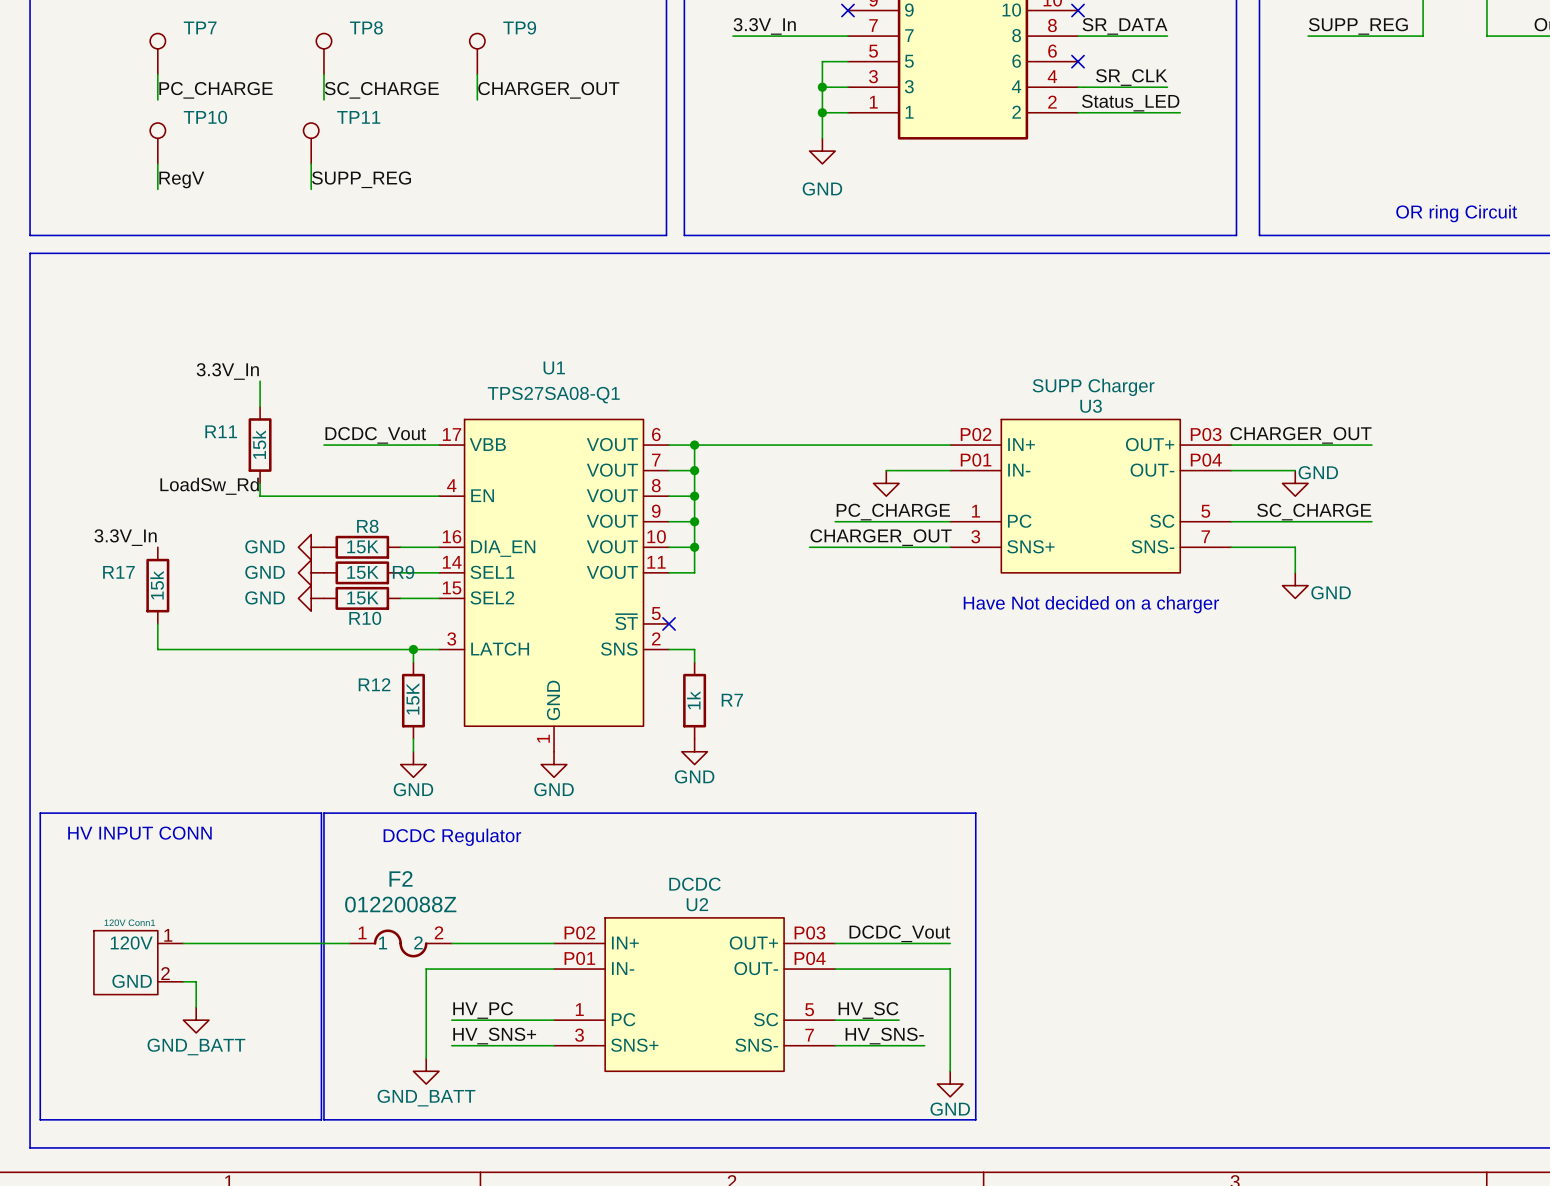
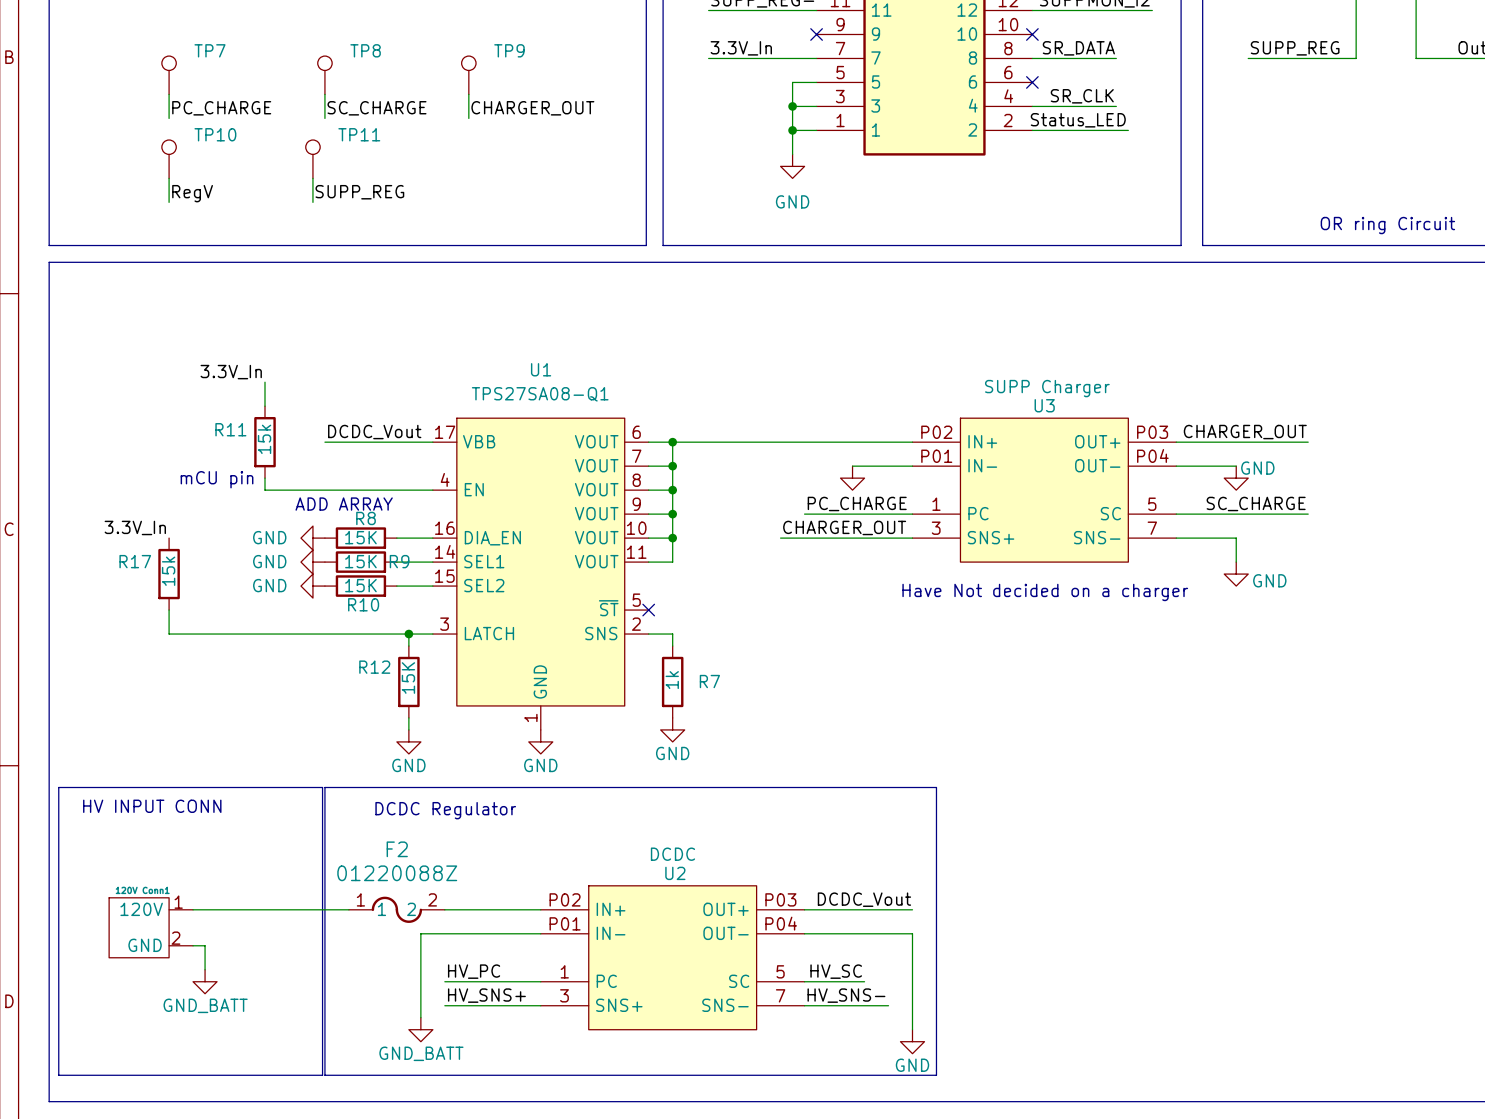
text: none -> mCU pin (217, 479)
label: LoadSw_Rd (209, 486) -> none
text: none -> ADD ARRAY (344, 504)

